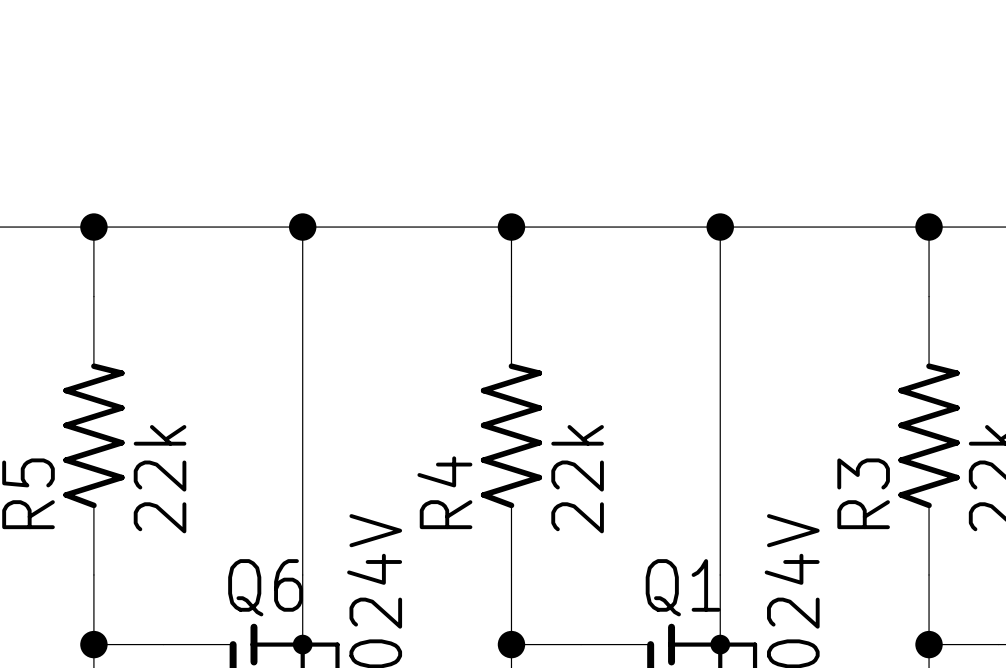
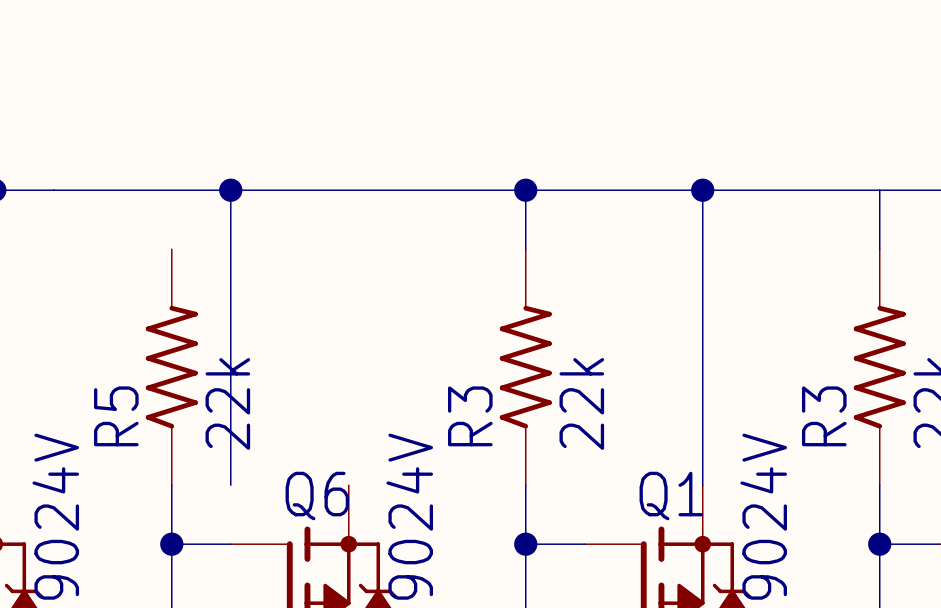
wire: (93, 227) (93, 296) -> none
junction: (93, 227) -> none
junction: none -> (230, 190)
wire: (302, 227) (302, 574) -> (230, 190) (230, 485)
junction: (302, 227) -> none
junction: (929, 227) -> none
R4 name: R4 (444, 492) -> R3 (470, 416)

